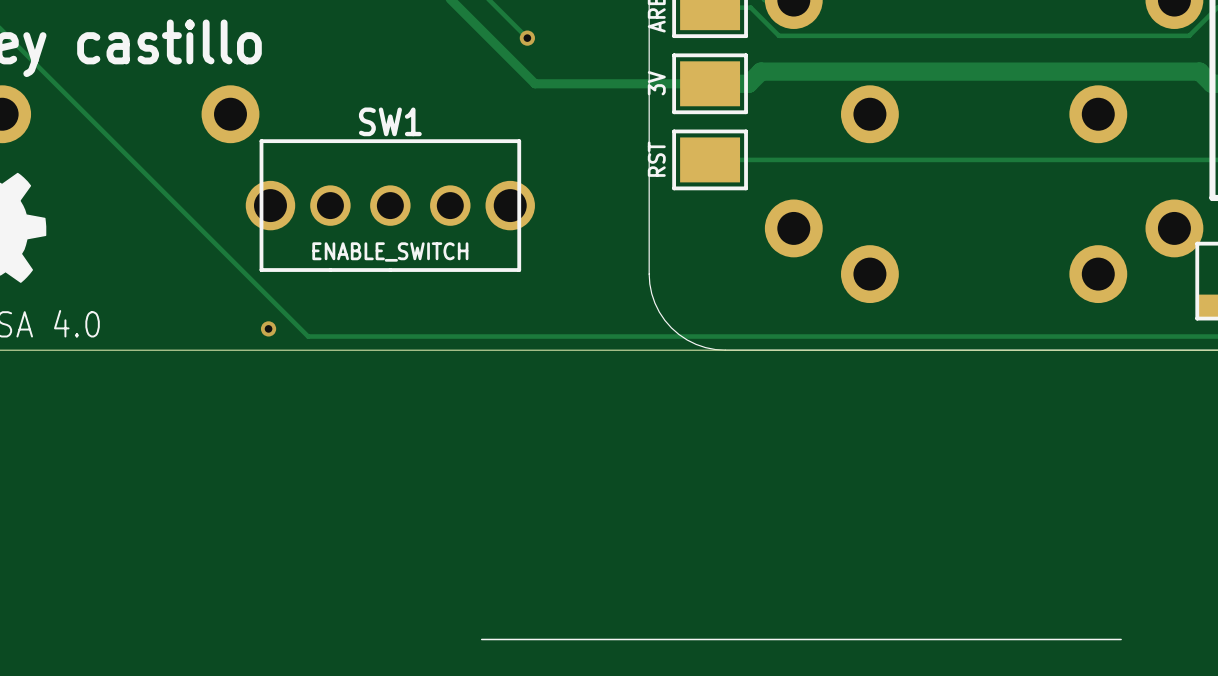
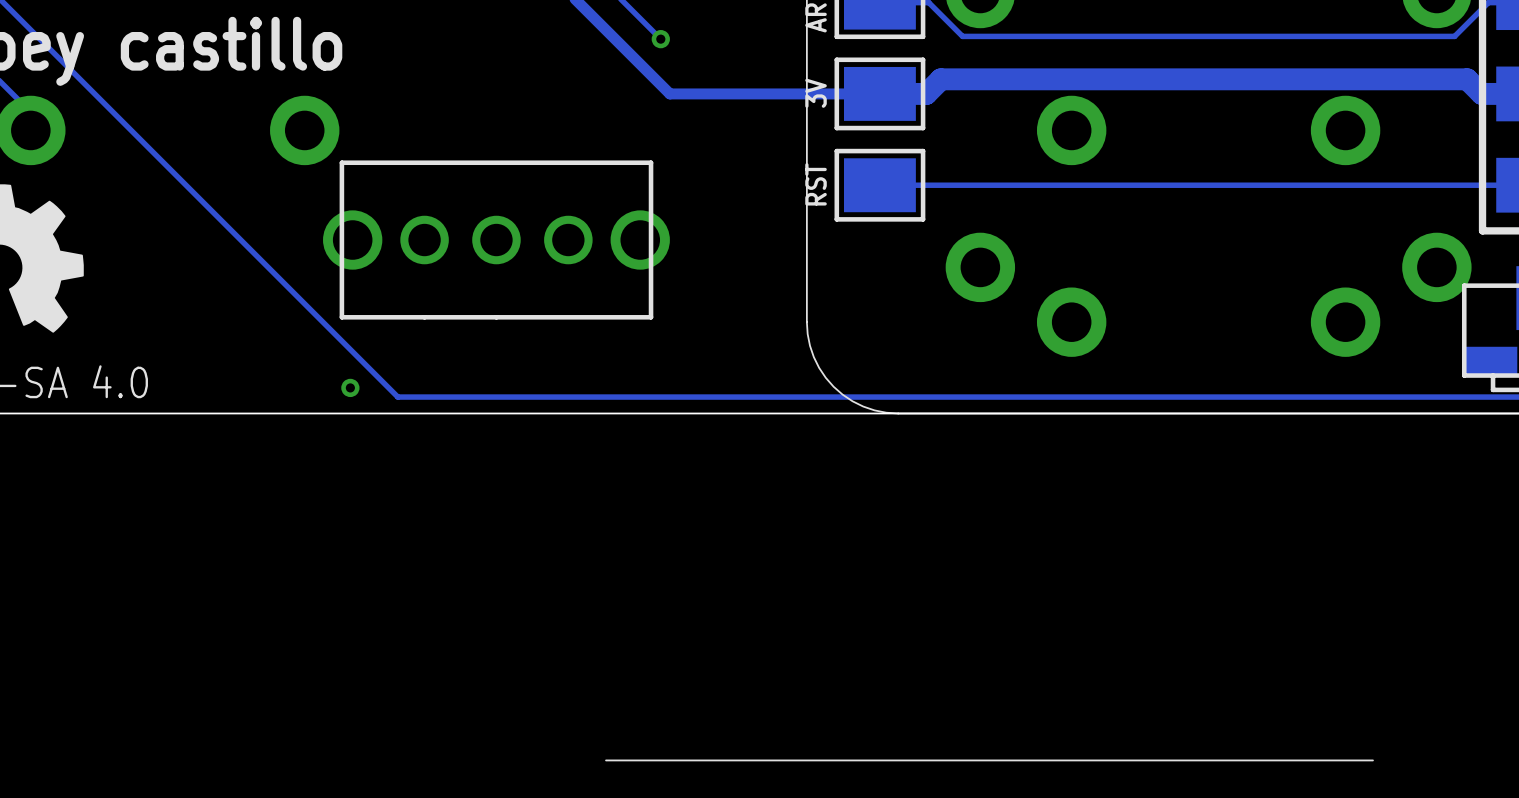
SW1 name: SW1 (390, 121) -> none
text: ENABLE_SWITCH (390, 251) -> none

